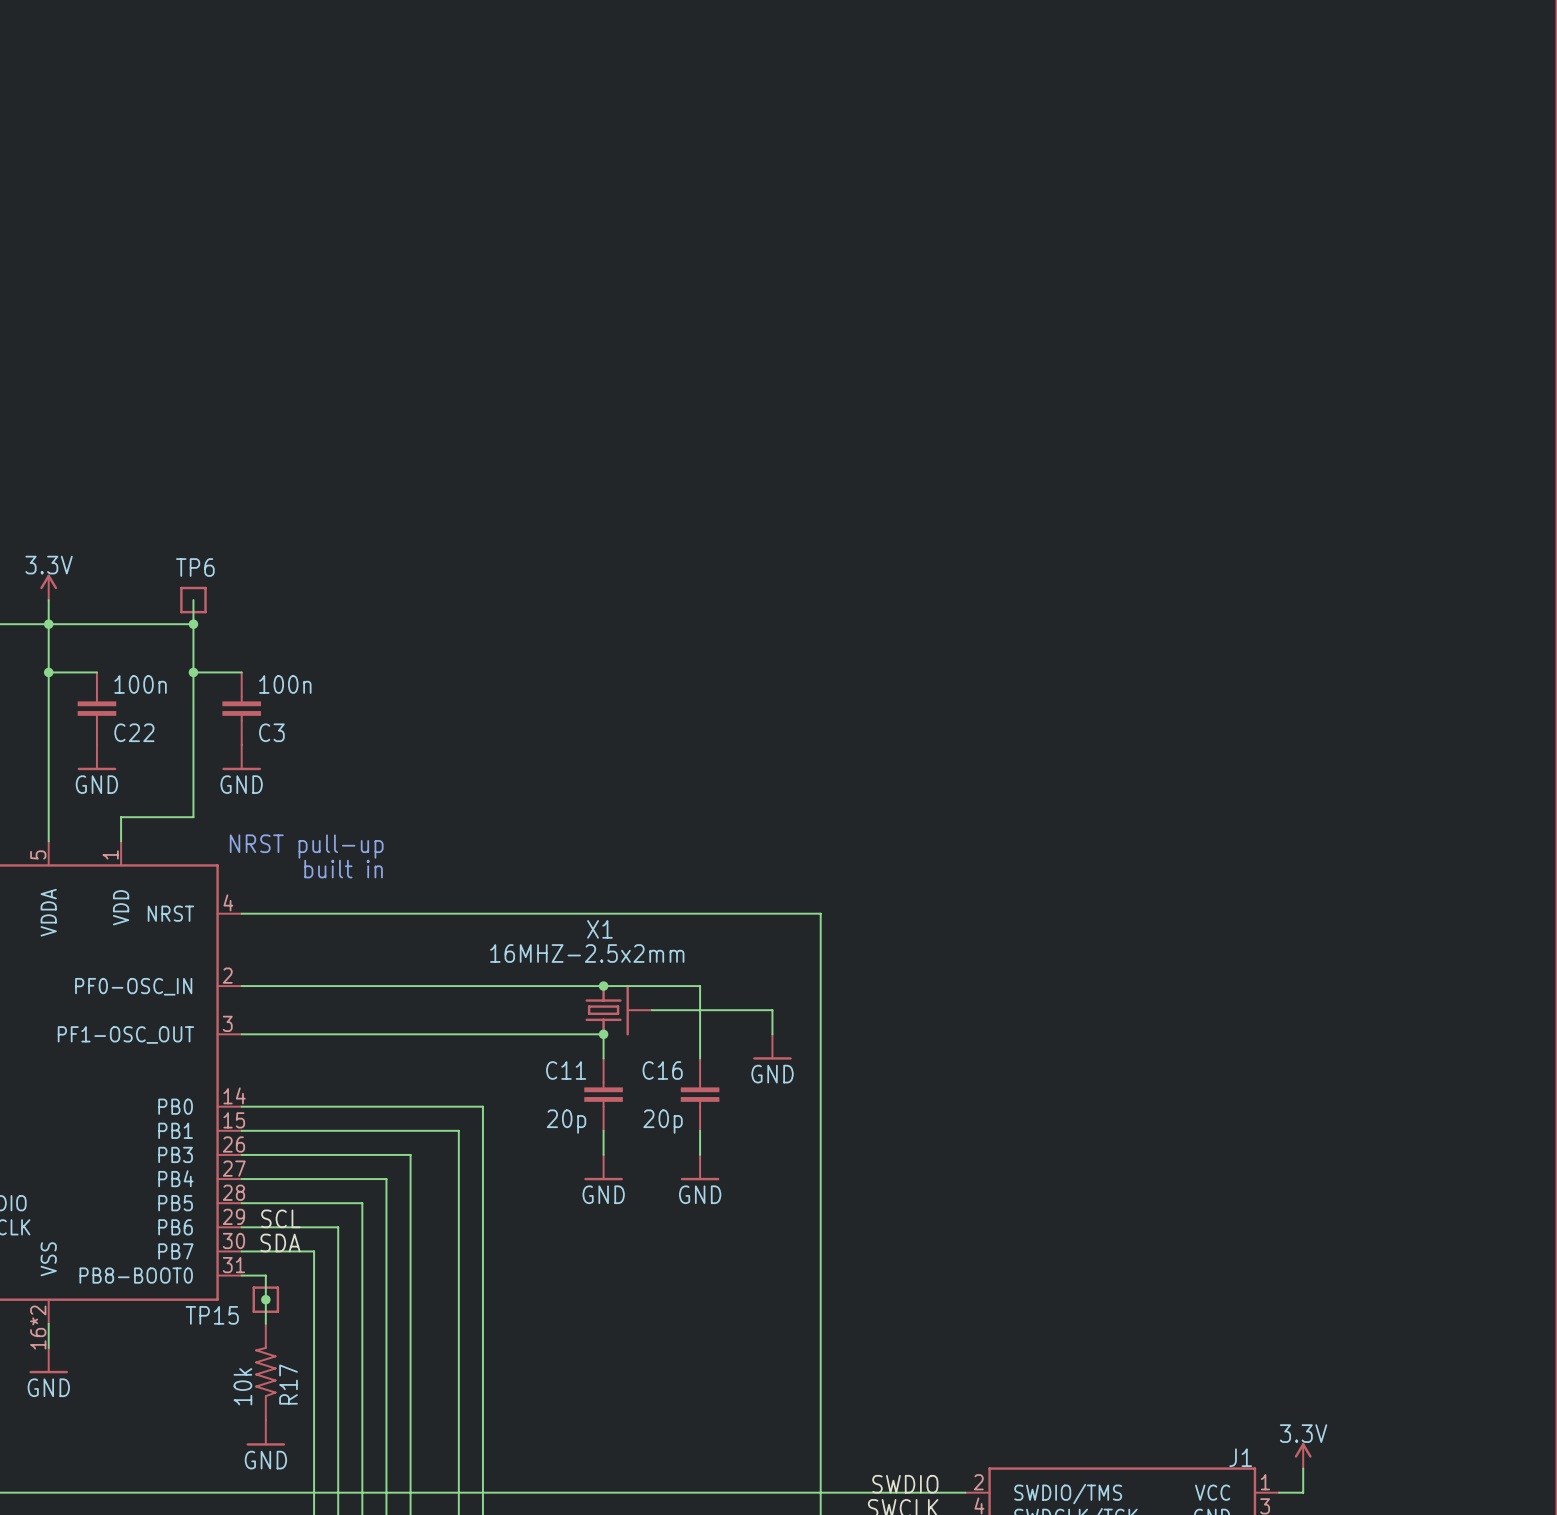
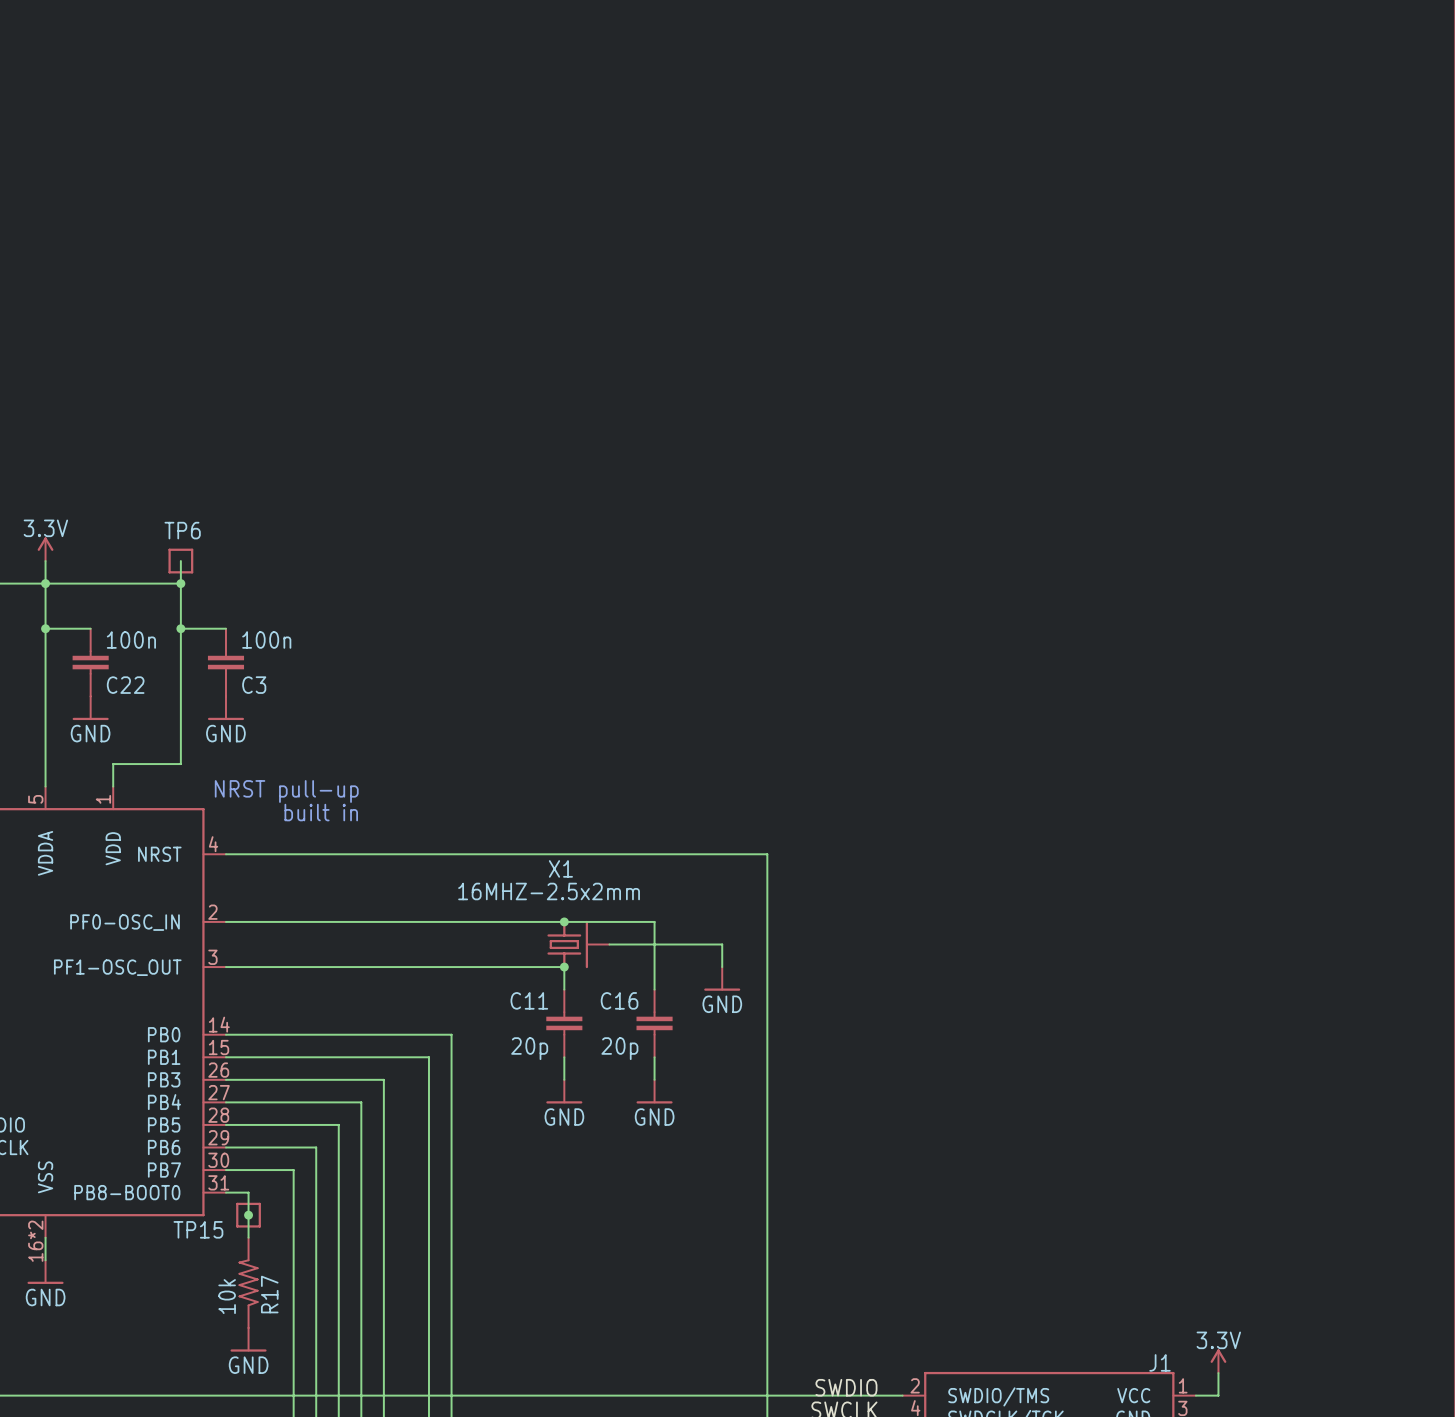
label: SCL (280, 1218) -> none
label: SDA (280, 1242) -> none

